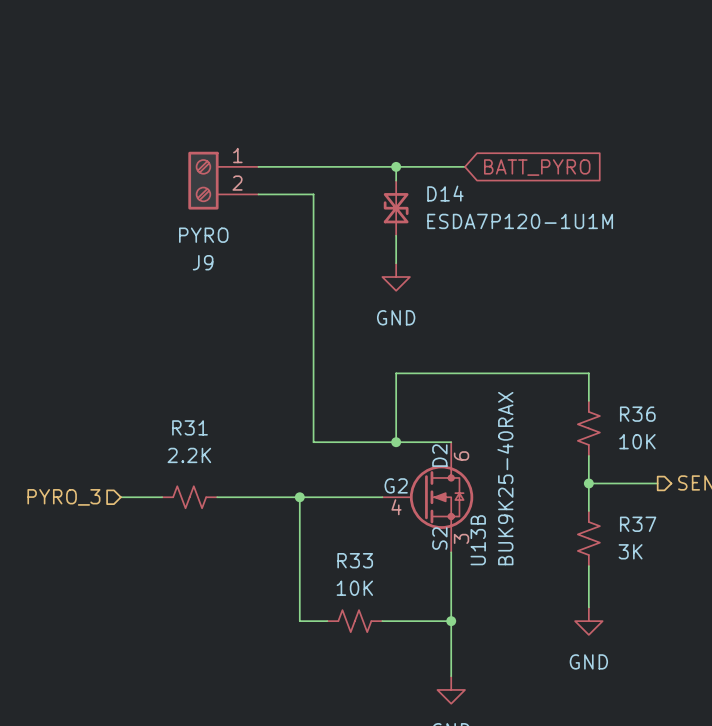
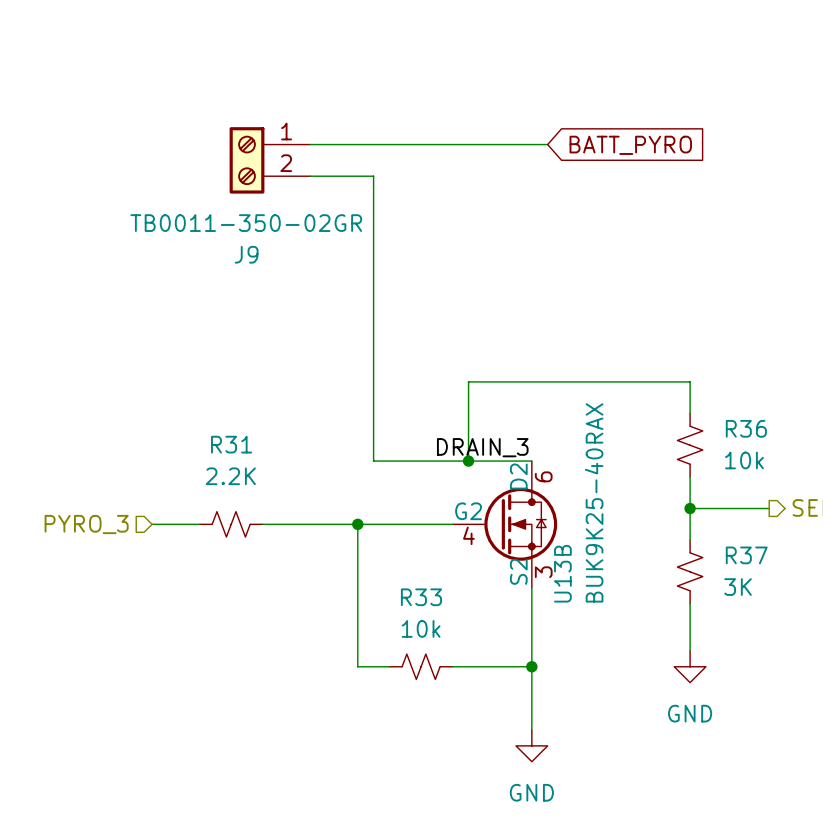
wire: (396, 166) (396, 180) -> none
junction: (396, 166) -> none
D14: ESDA7P120-1U1M (396, 208) -> none
J9 value: PYRO (203, 235) -> TB0011-350-02GR (246, 223)
wire: (396, 235) (396, 263) -> none
power symbol: GND (396, 277) -> none
label: none -> DRAIN_3 (482, 447)
R36 value: 10K (637, 441) -> 10k (744, 460)
R33 value: 10K (354, 588) -> 10k (421, 628)

